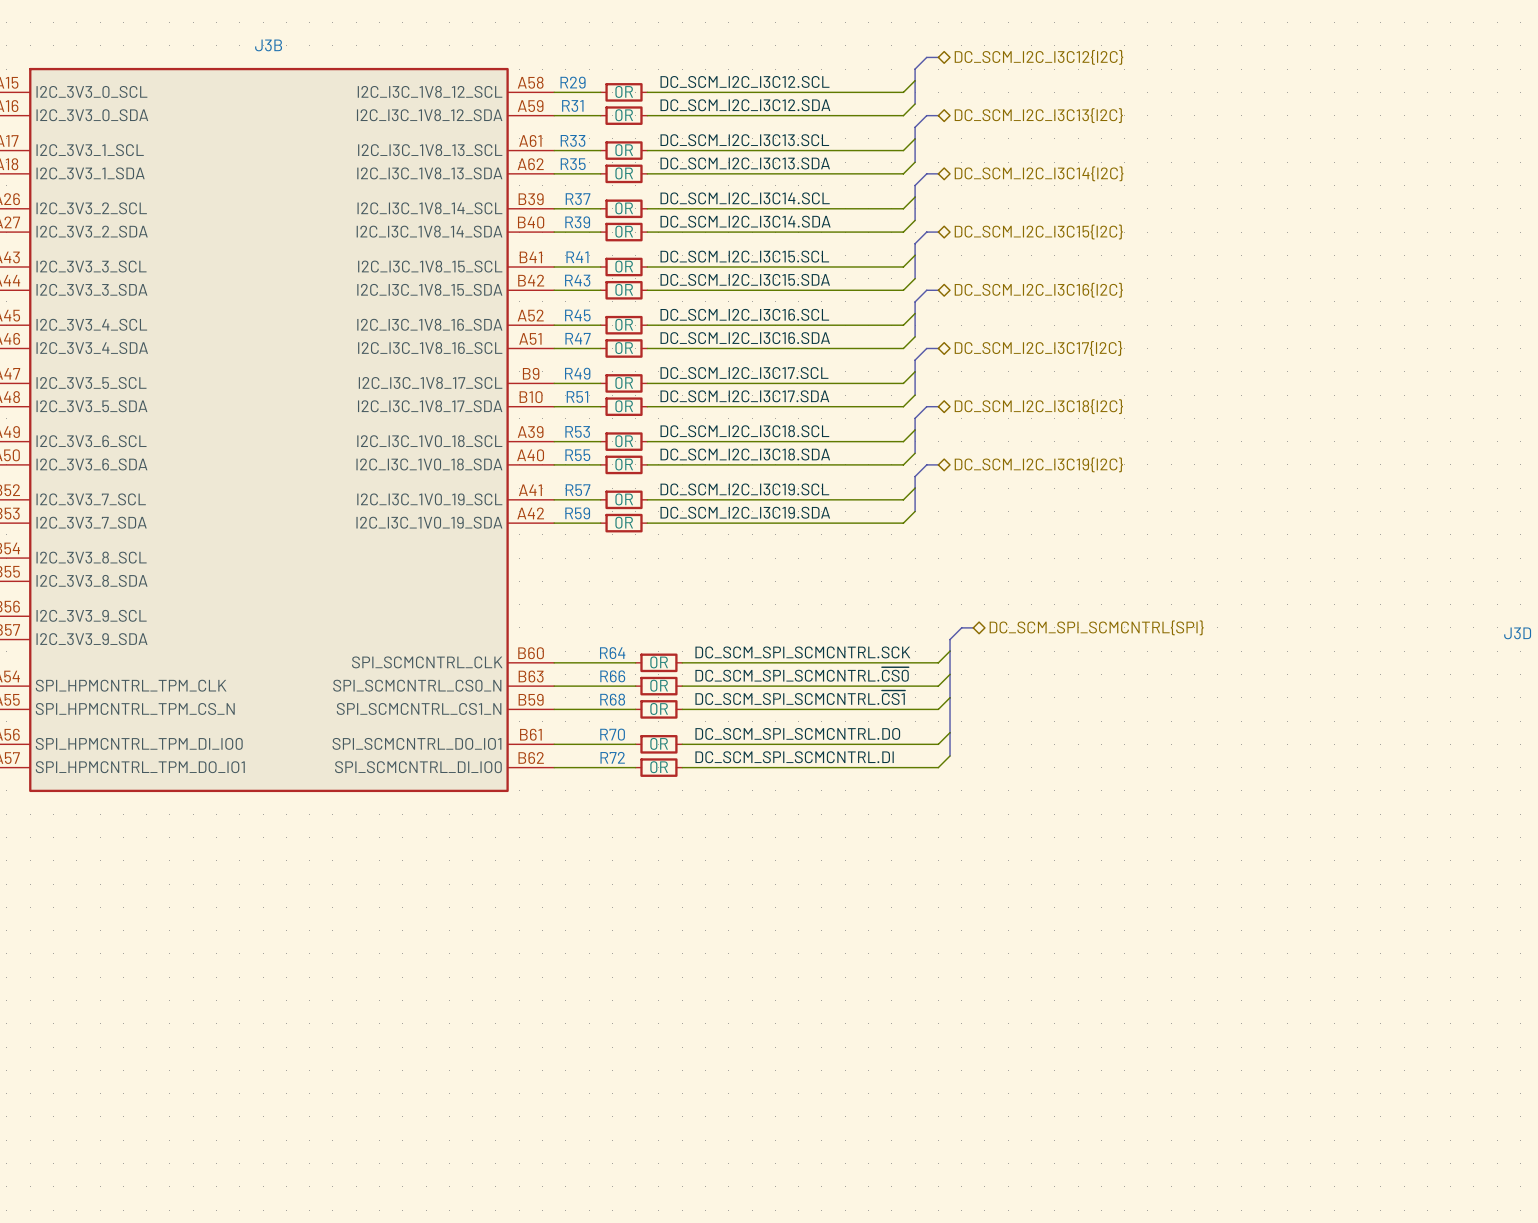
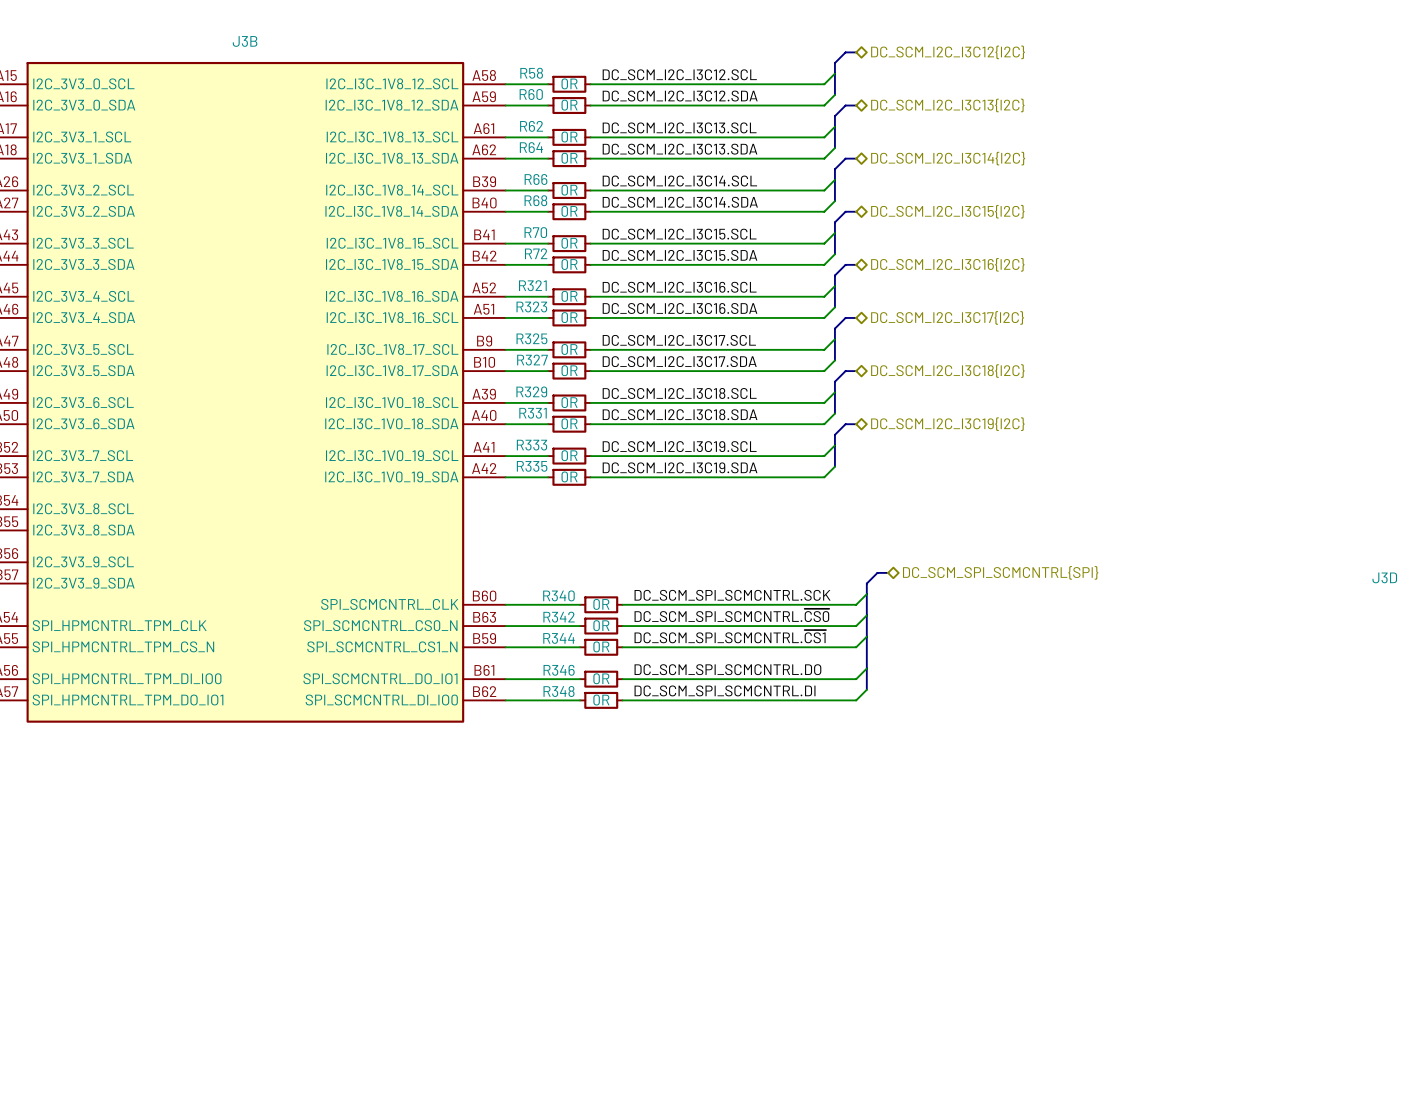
R29 name: R29 (573, 82) -> R58 (531, 73)
R31 name: R31 (572, 105) -> R60 (531, 94)
R33 name: R33 (573, 140) -> R62 (531, 126)
R35 name: R35 (573, 164) -> R64 (531, 147)
R37 name: R37 (578, 199) -> R66 (536, 179)
R39 name: R39 (577, 222) -> R68 (535, 200)
R41 name: R41 (577, 257) -> R70 (535, 232)
R43 name: R43 (577, 280) -> R72 (536, 253)
R45 name: R45 (577, 315) -> R321 (532, 285)
R47 name: R47 (578, 338) -> R323 (531, 306)
R49 name: R49 (577, 373) -> R325 (531, 338)
R51 name: R51 (577, 397) -> R327 (532, 360)
R53 name: R53 (577, 431) -> R329 (531, 391)
R55 name: R55 (577, 455) -> R331 (533, 413)
R57 name: R57 (578, 490) -> R333 (531, 445)
R59 name: R59 (577, 513) -> R335 (532, 466)
R64 name: R64 (612, 653) -> R340 (558, 595)
R66 name: R66 (612, 676) -> R342 (559, 617)
R68 name: R68 (612, 699) -> R344 (559, 638)
R70 name: R70 (612, 734) -> R346 (559, 670)
R72 name: R72 (612, 757) -> R348 (559, 691)

